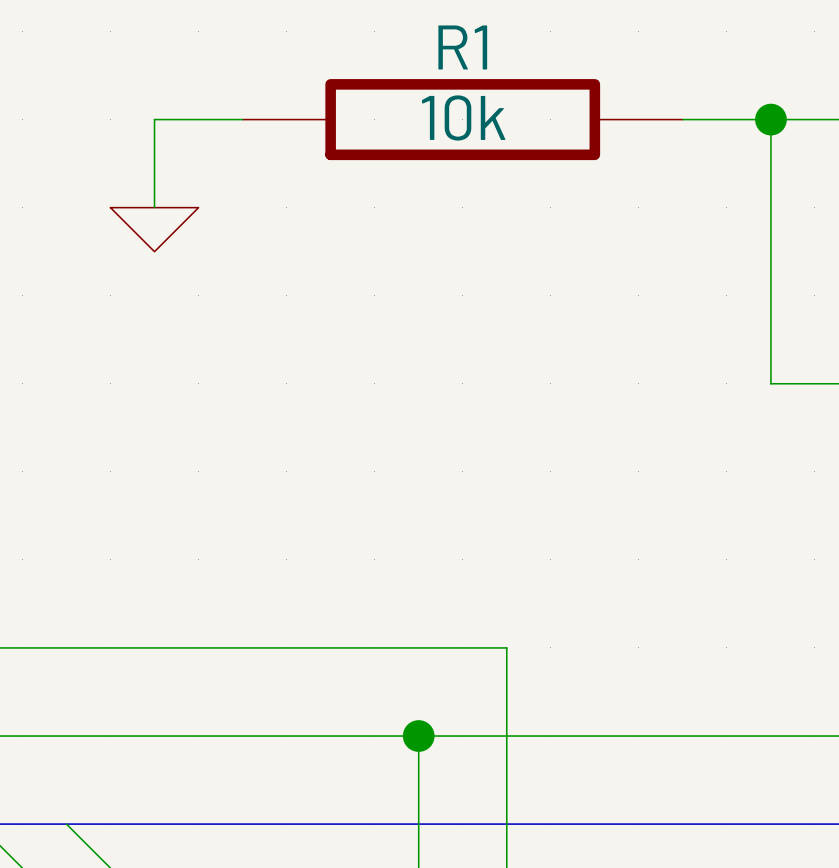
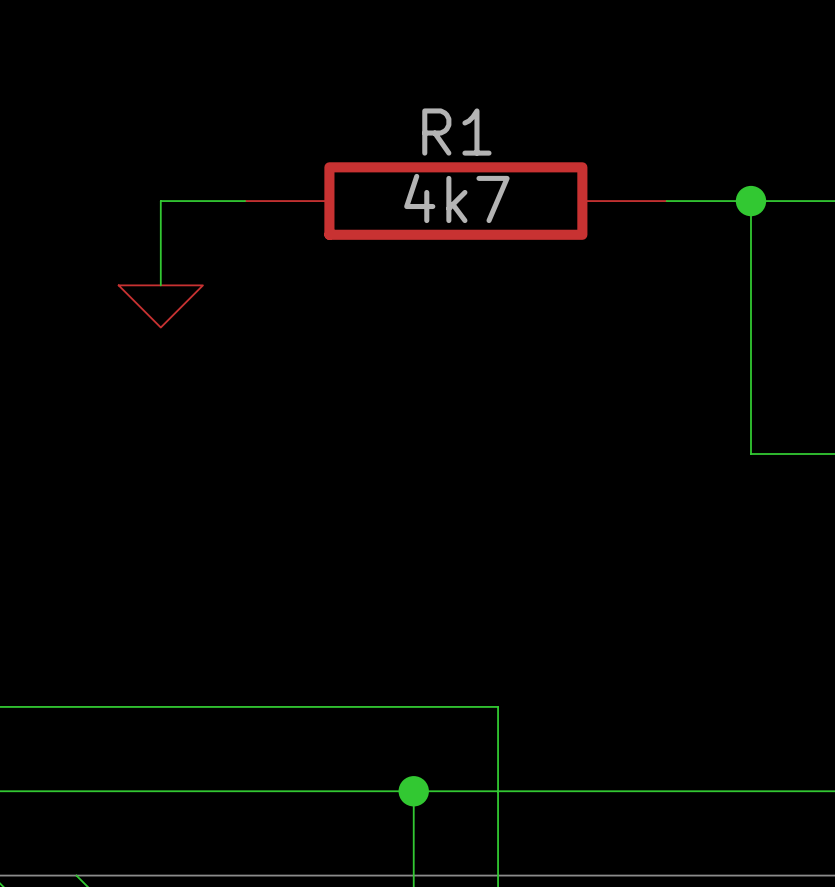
R1 value: 10k (463, 117) -> 4k7 (456, 198)

